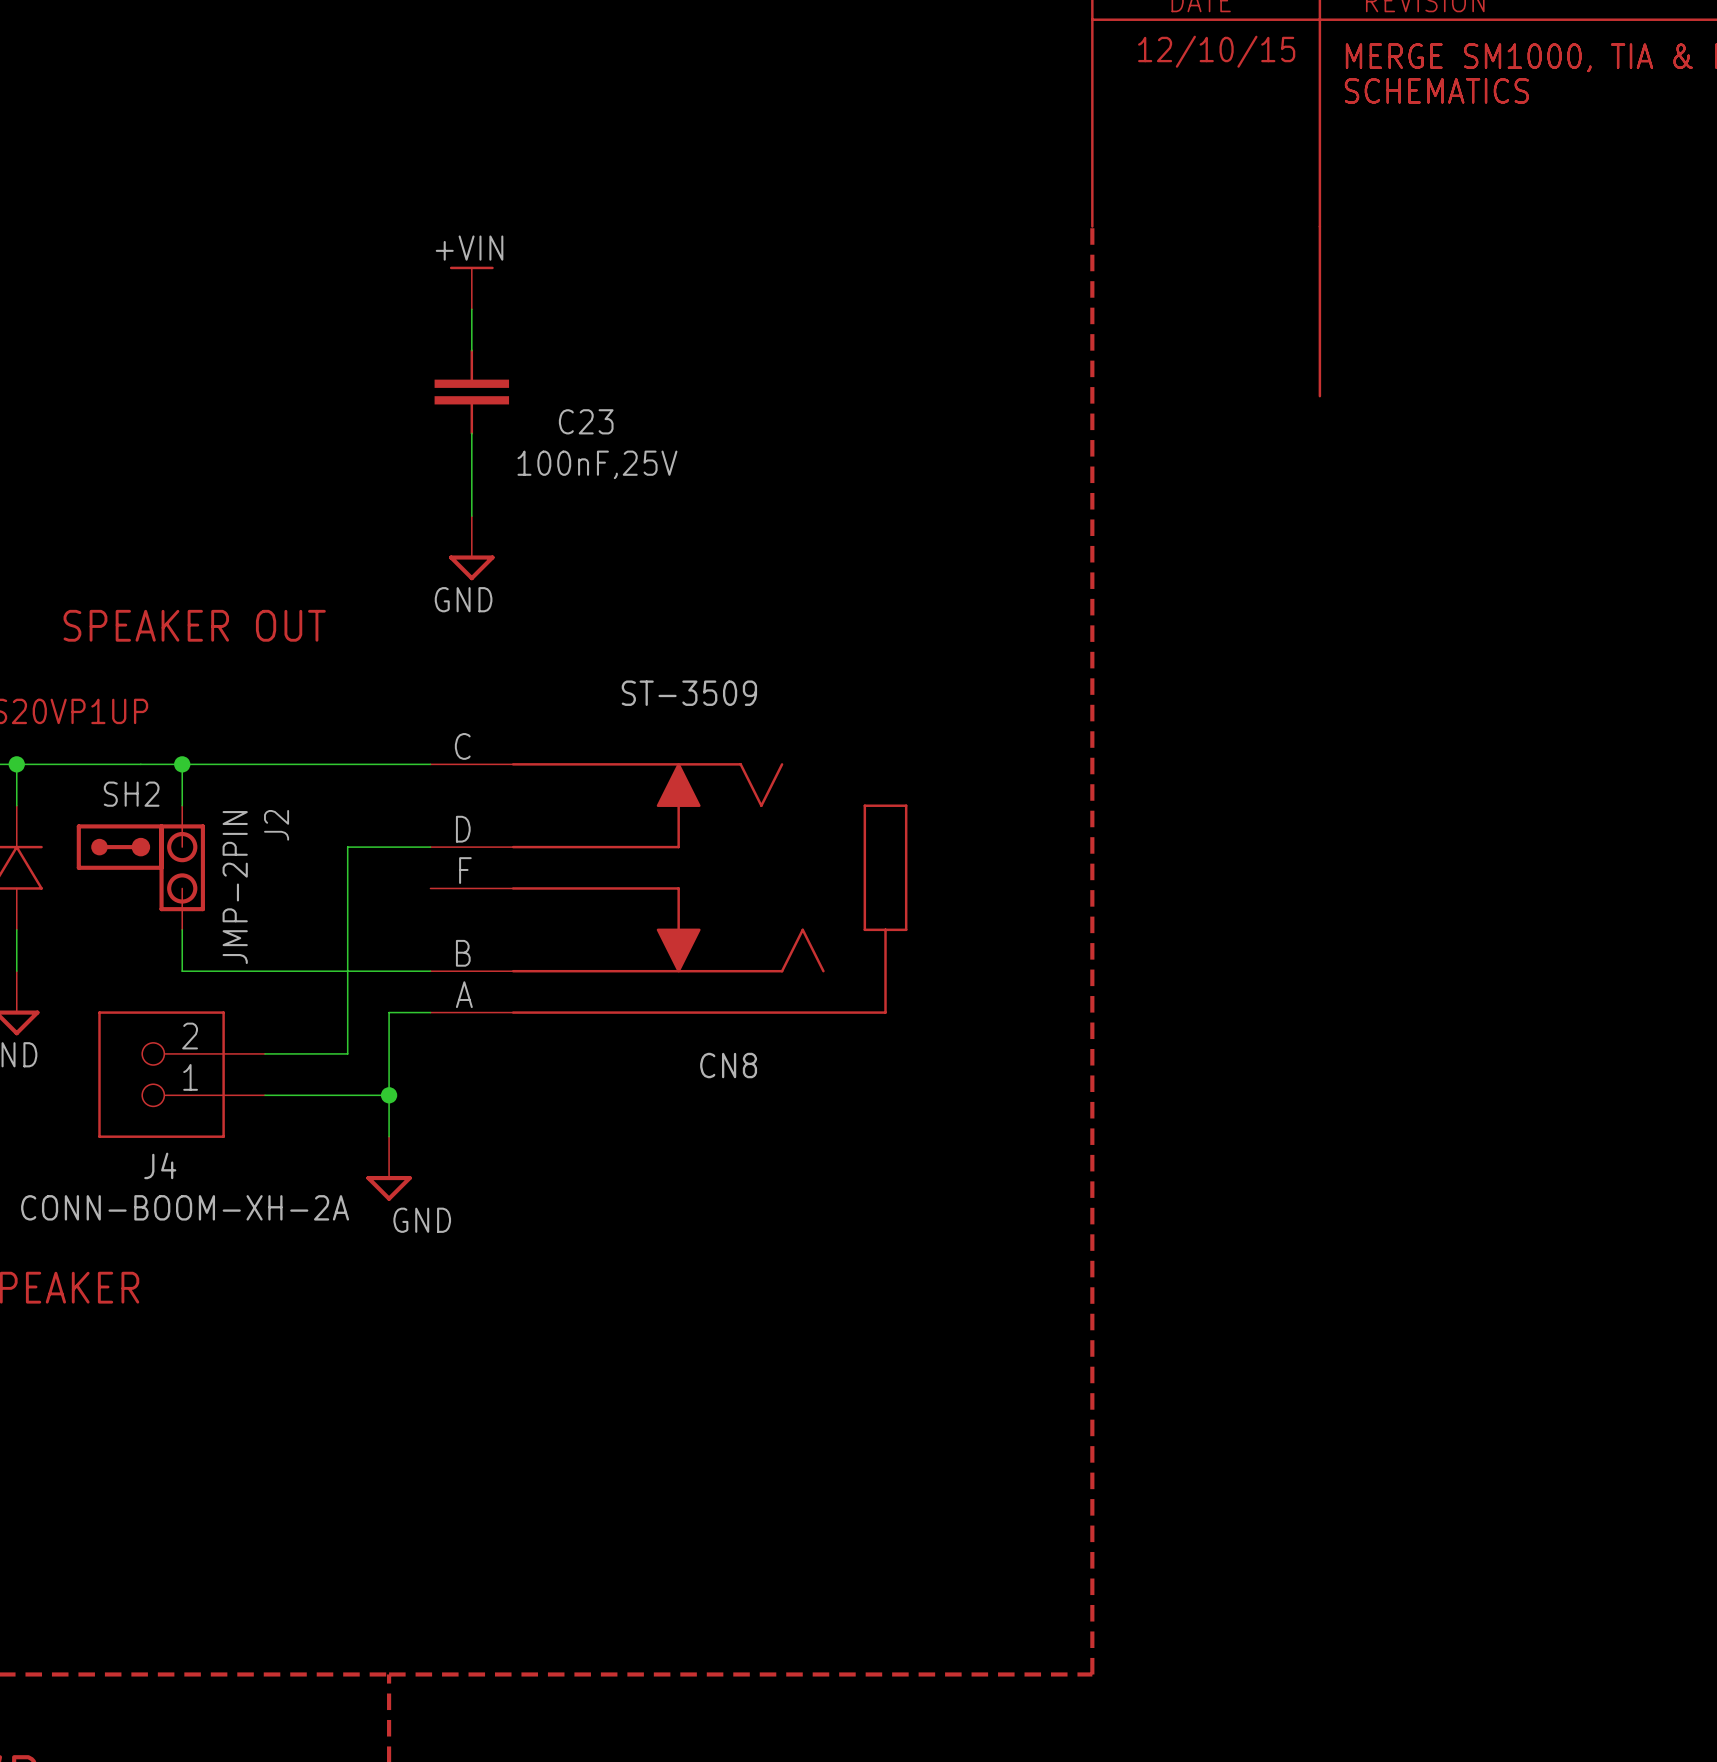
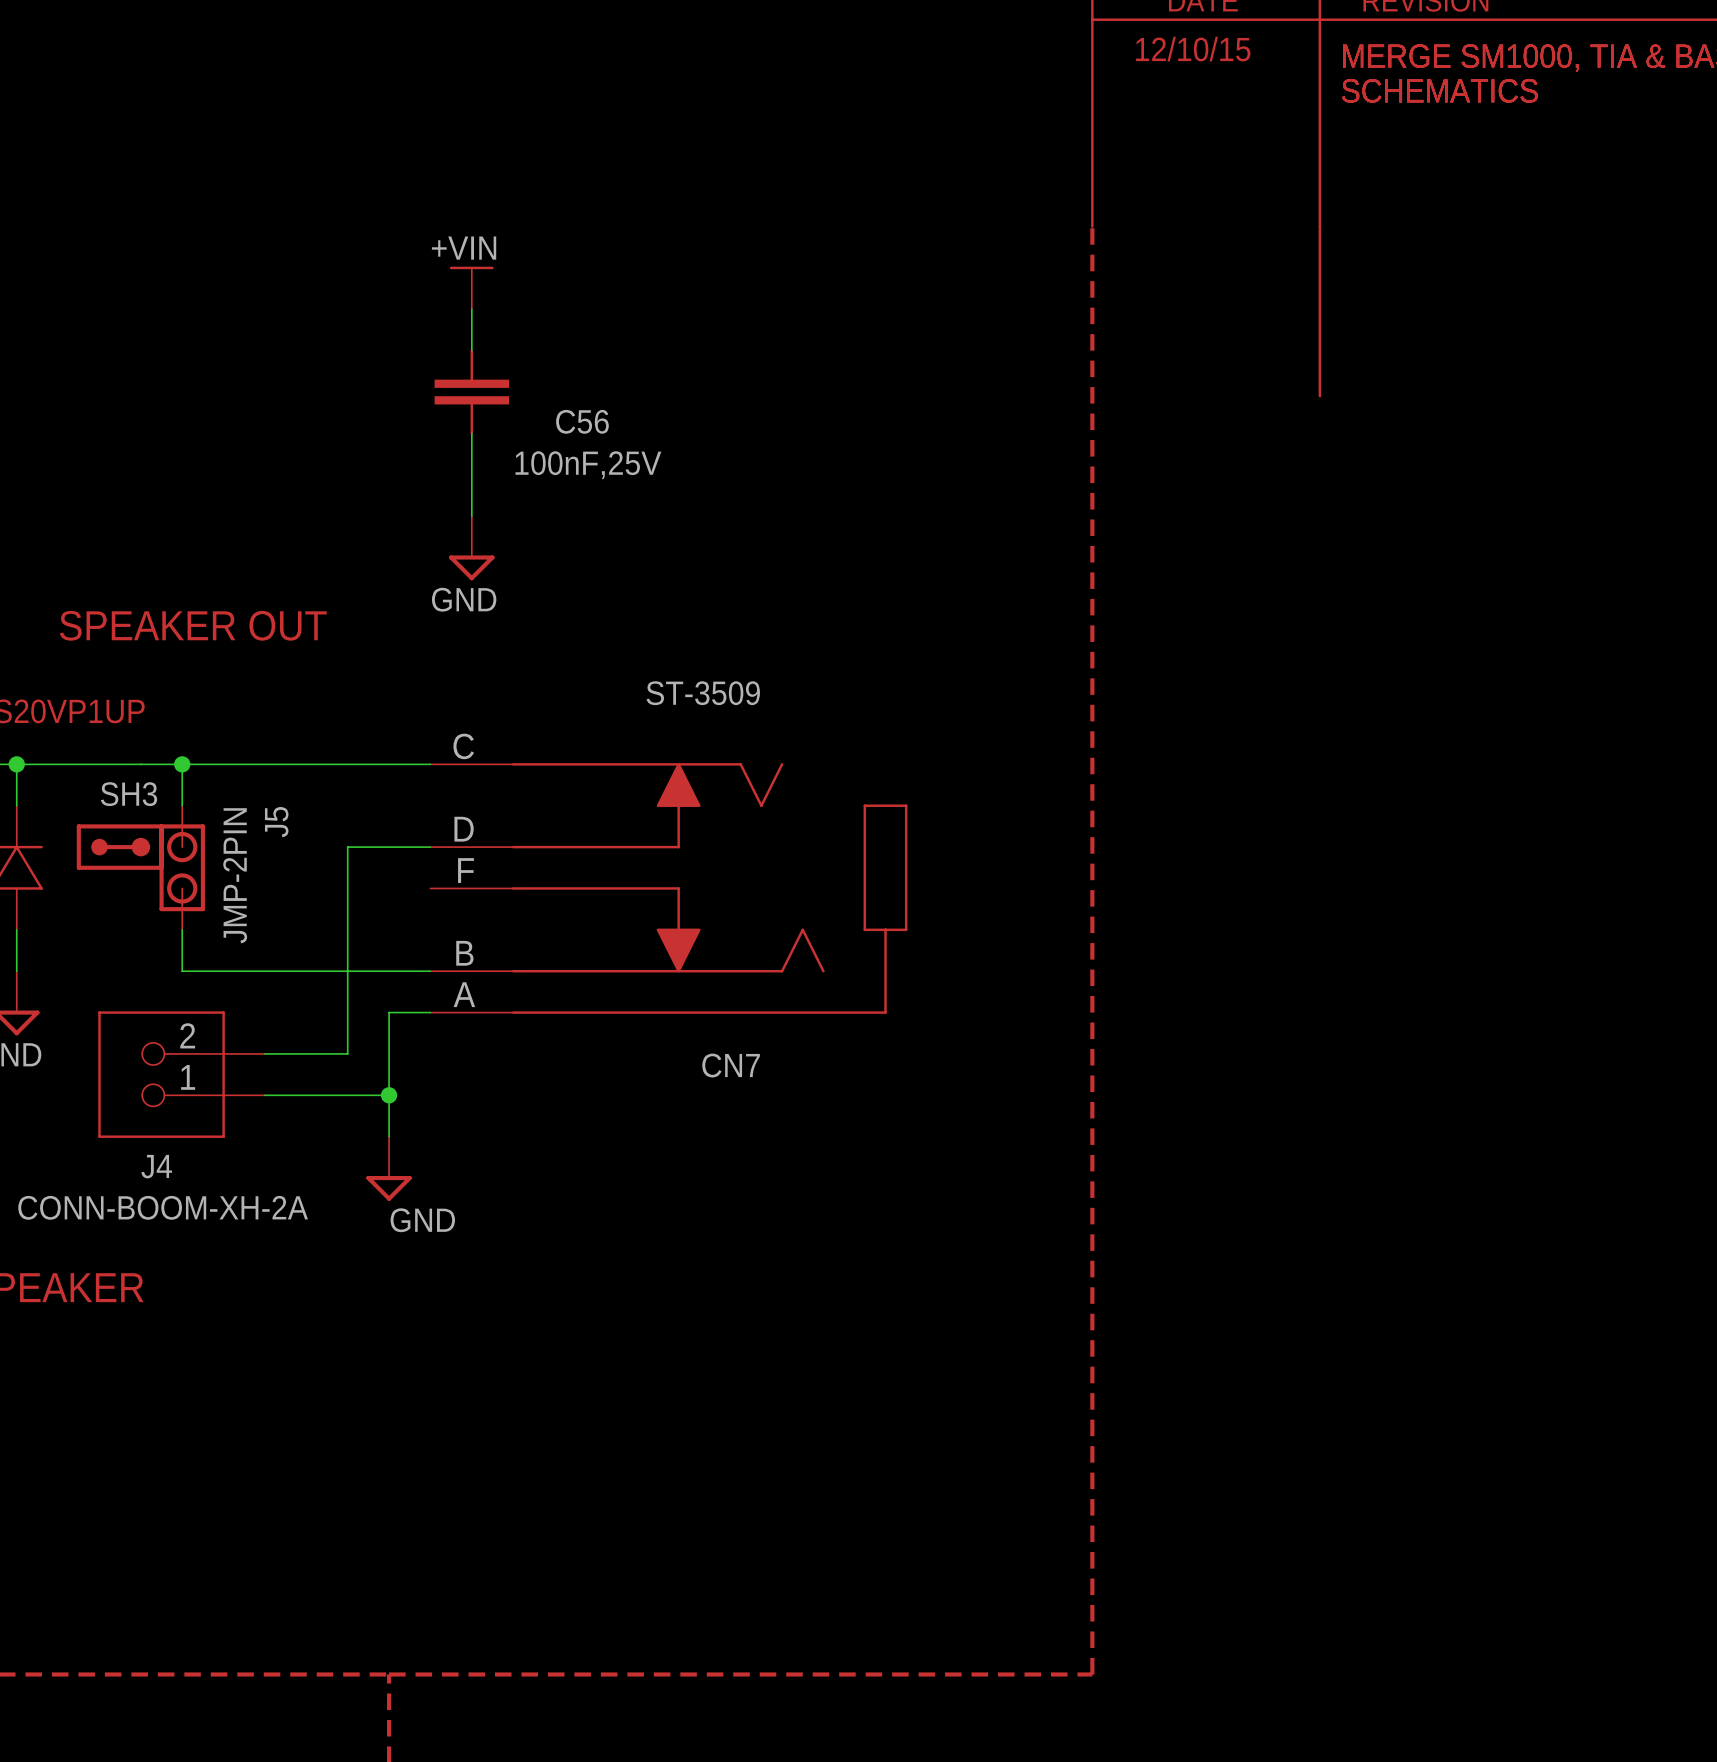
C23 name: C23 (586, 421) -> C56 (582, 421)
SH2 name: SH2 (131, 794) -> SH3 (128, 794)
J2 name: J2 (276, 825) -> J5 (276, 822)
CN8 name: CN8 (728, 1065) -> CN7 (731, 1065)

